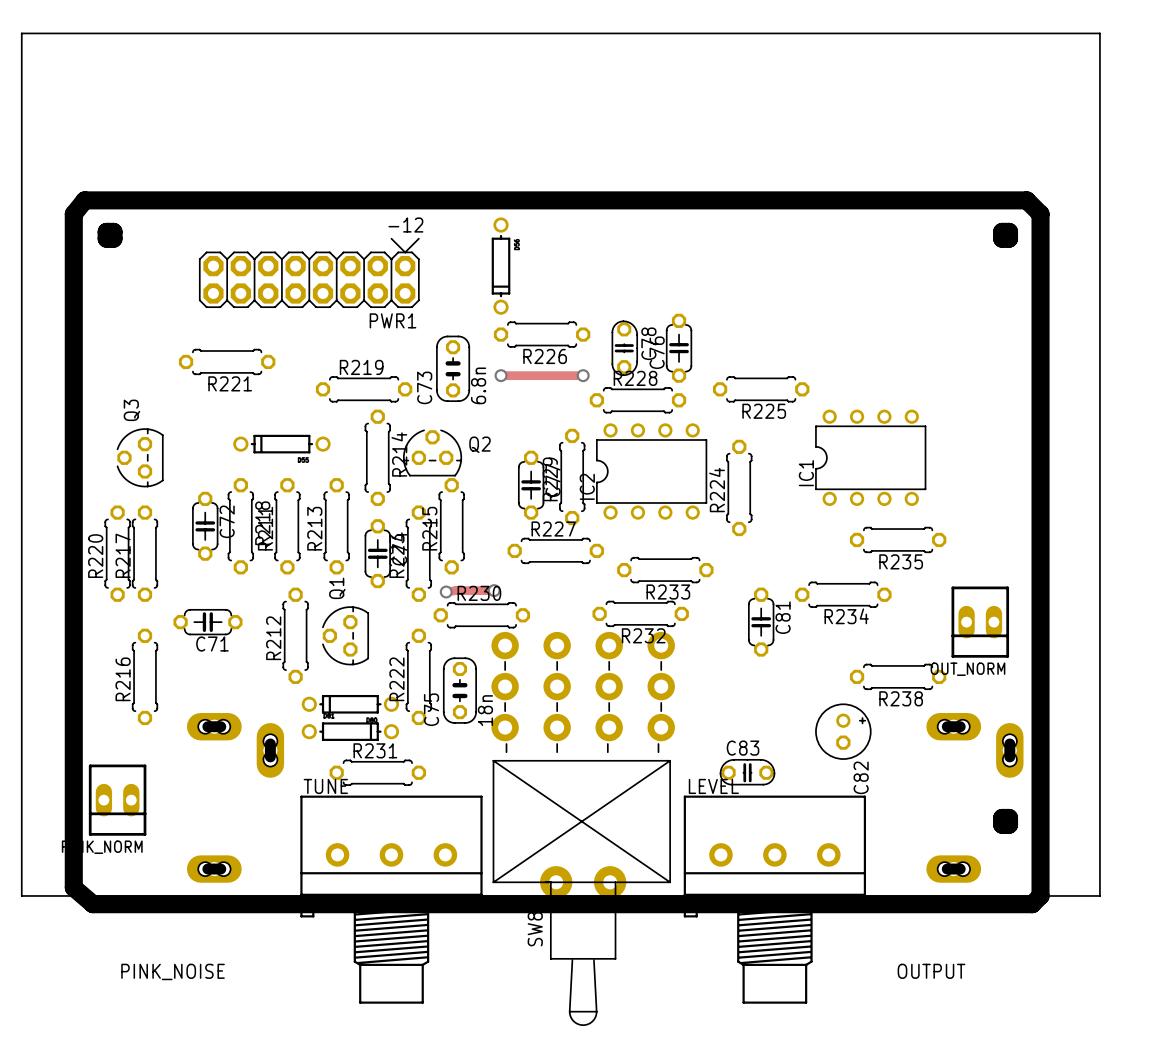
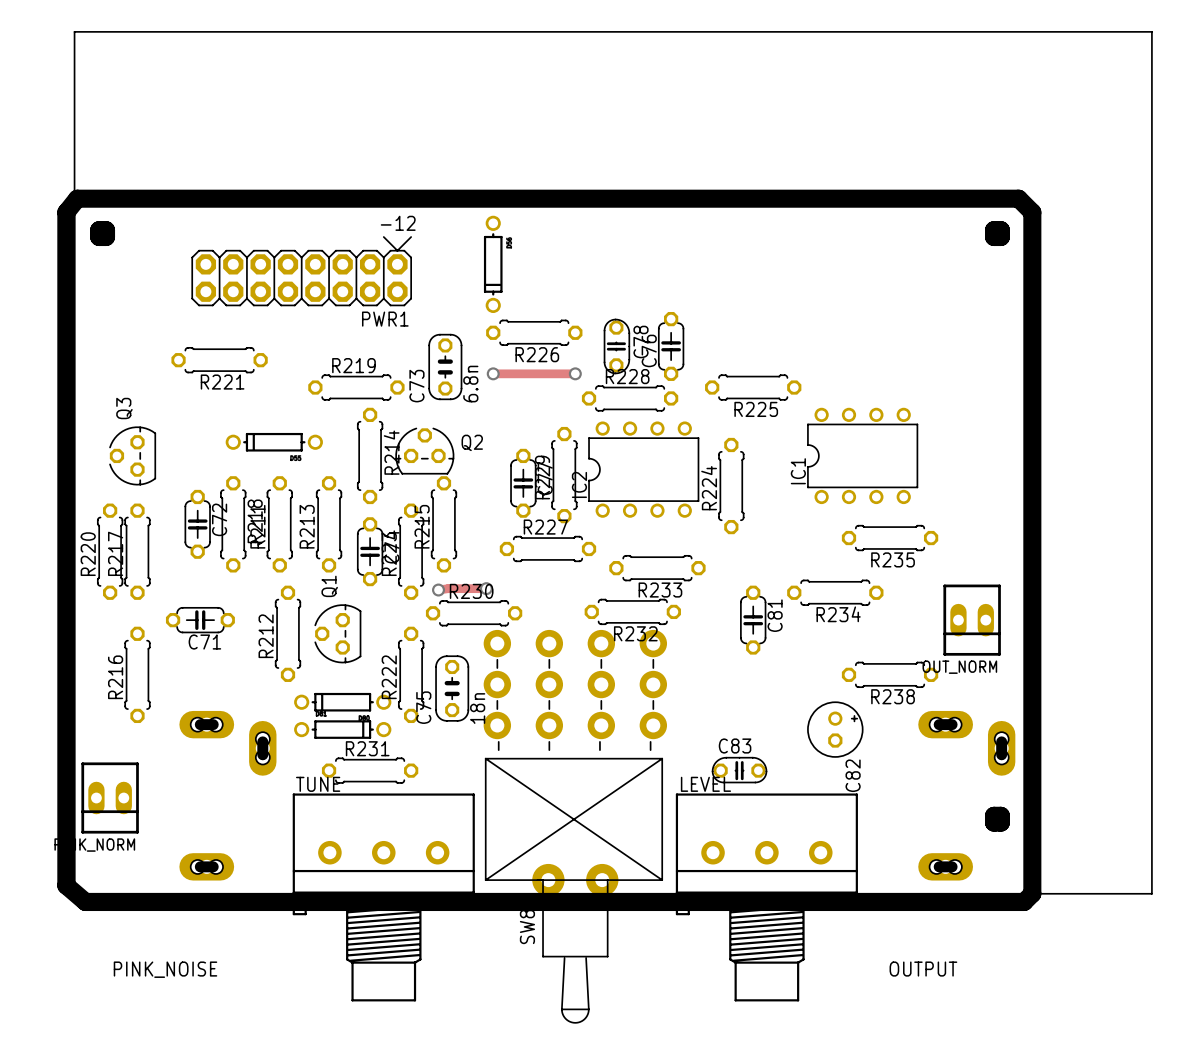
board edge: (82, 33) (21, 33) (21, 895) (82, 895) -> (74, 31) (74, 893)
board edge: (1099, 33) (1099, 895) -> (1091, 31) (1151, 31) (1151, 893) (1091, 893)

